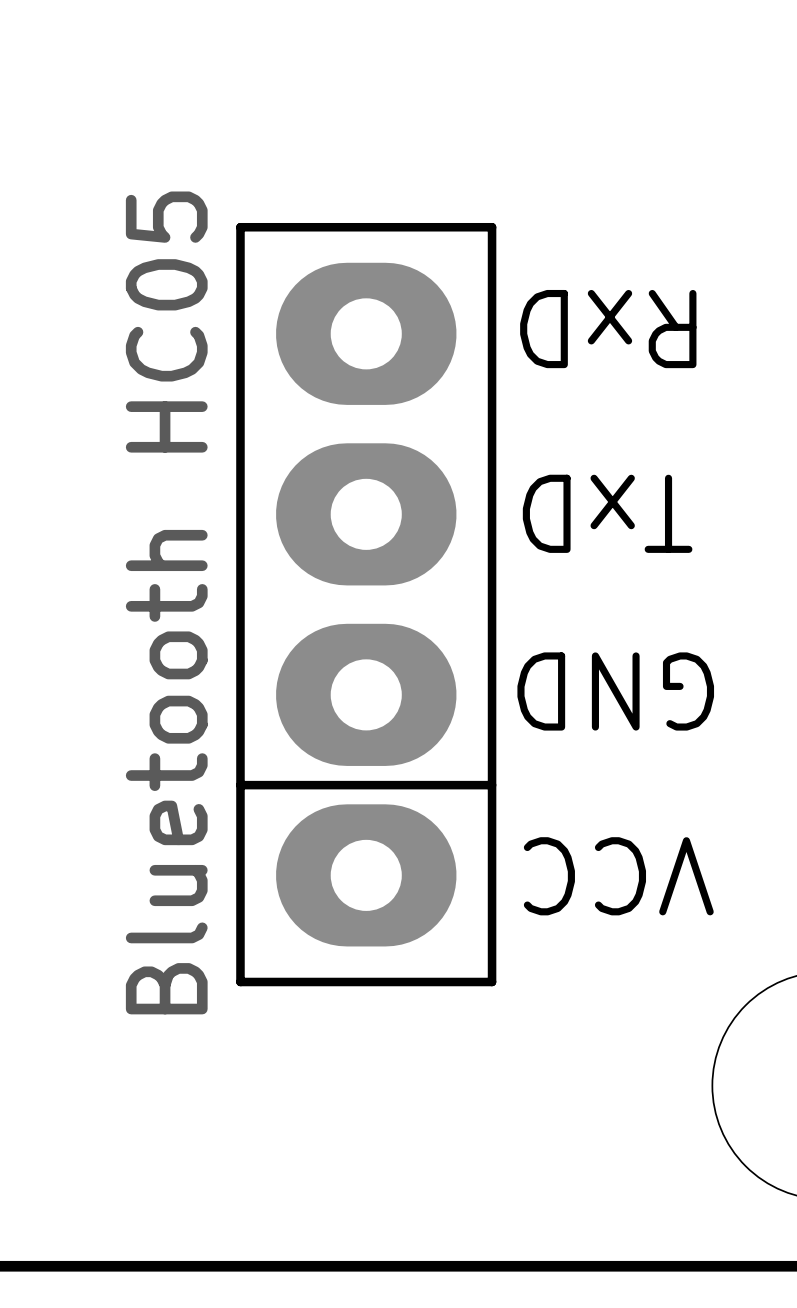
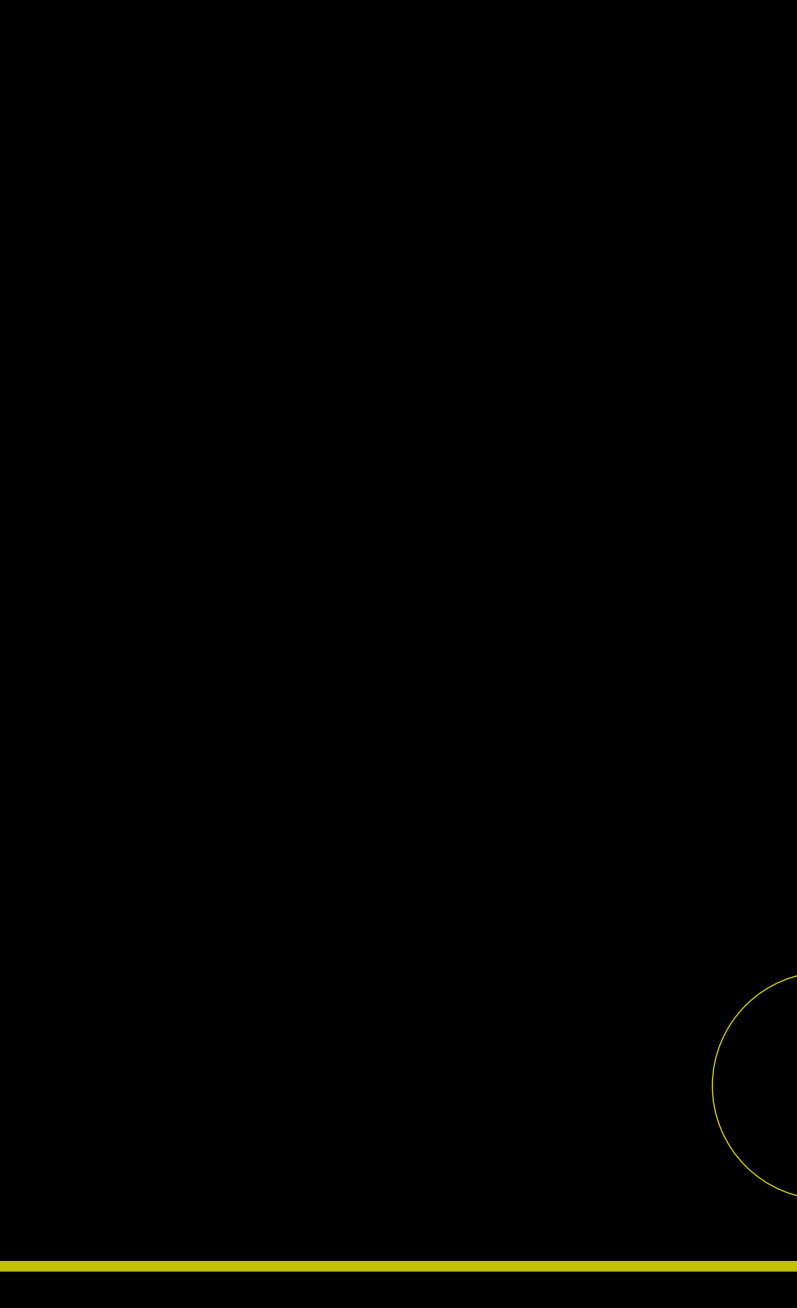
part: Bluetooth HC05 (366, 604) -> none

